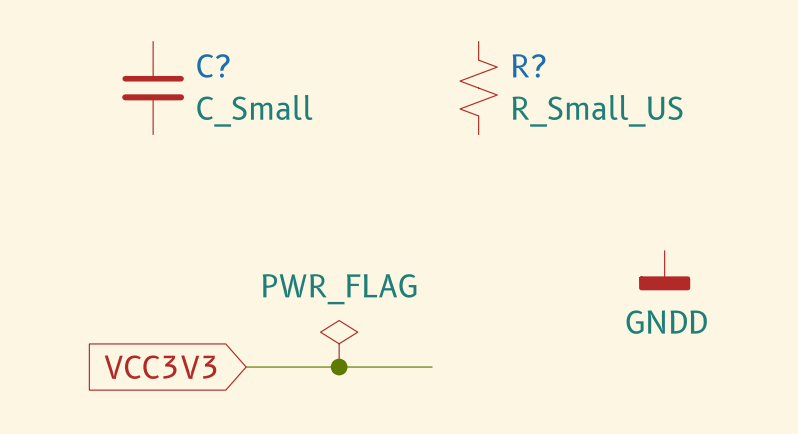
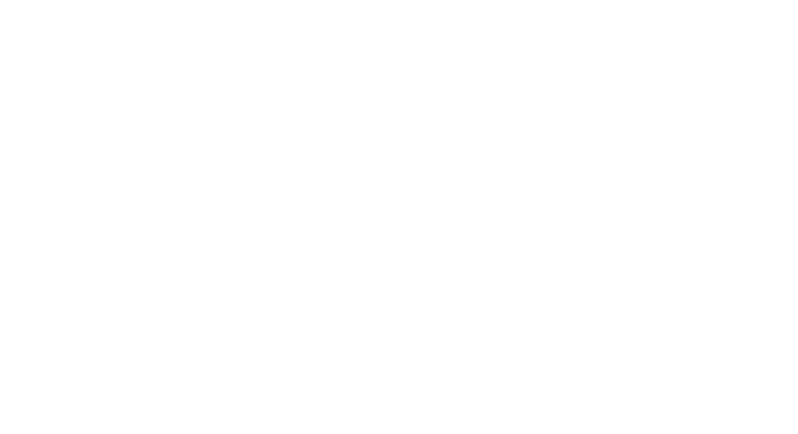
C?: C_Small (153, 88) -> none
R?: R_Small_US (478, 88) -> none
power symbol: GNDD (664, 270) -> none
power symbol: PWR_FLAG (339, 343) -> none
global label: VCC3V3 (160, 367) -> none
wire: (246, 367) (432, 367) -> none
junction: (339, 367) -> none

